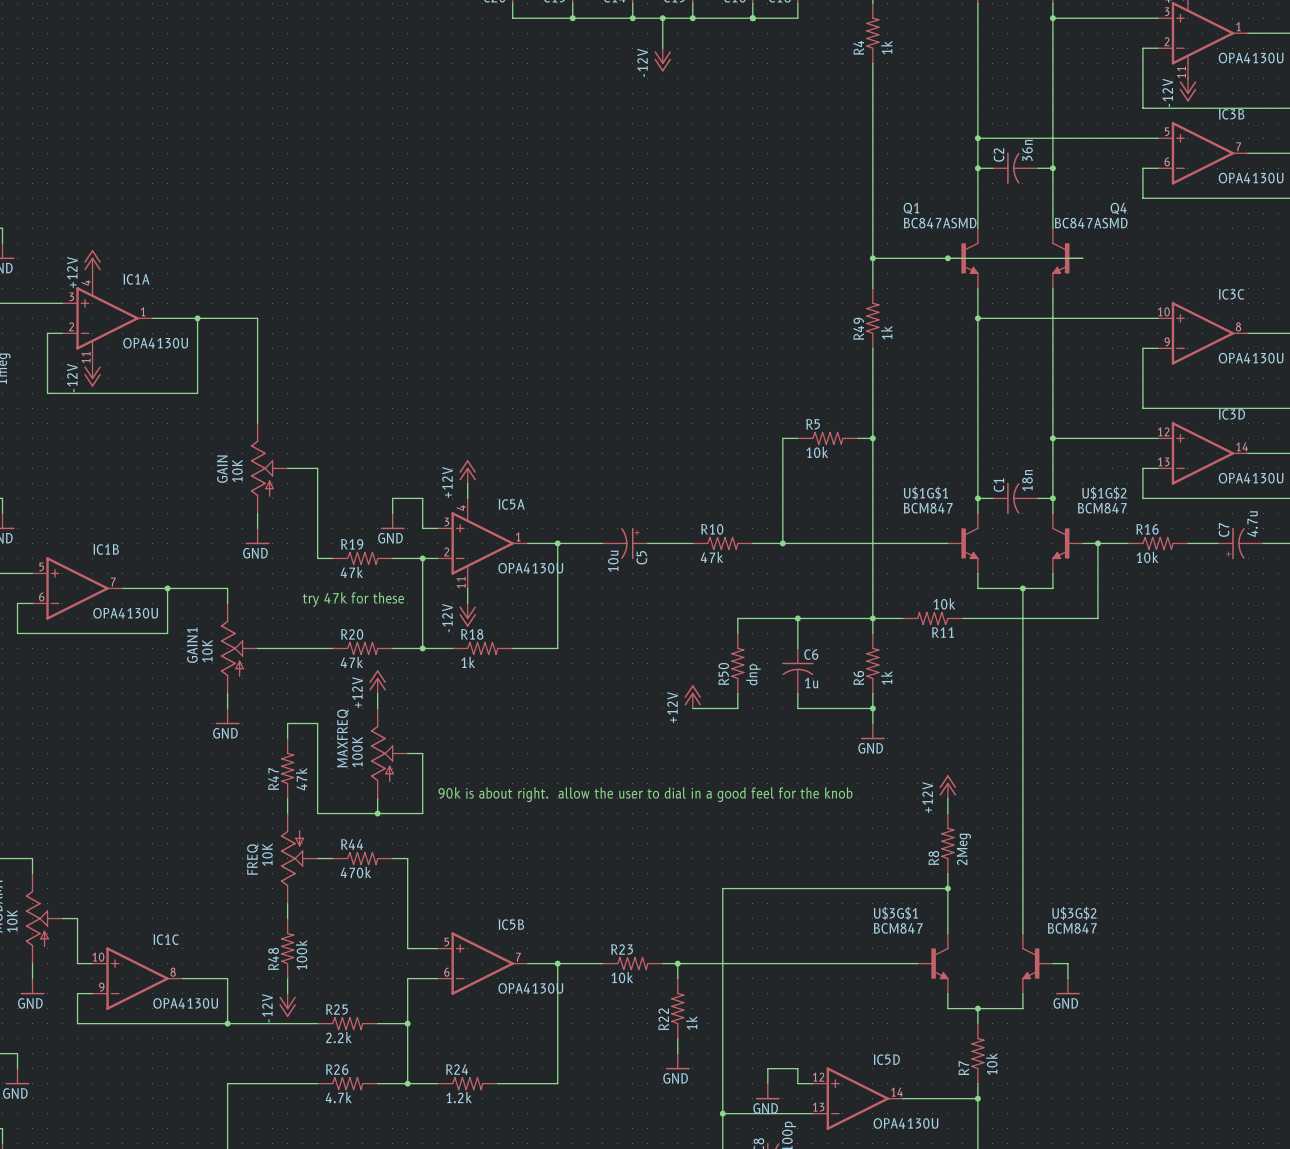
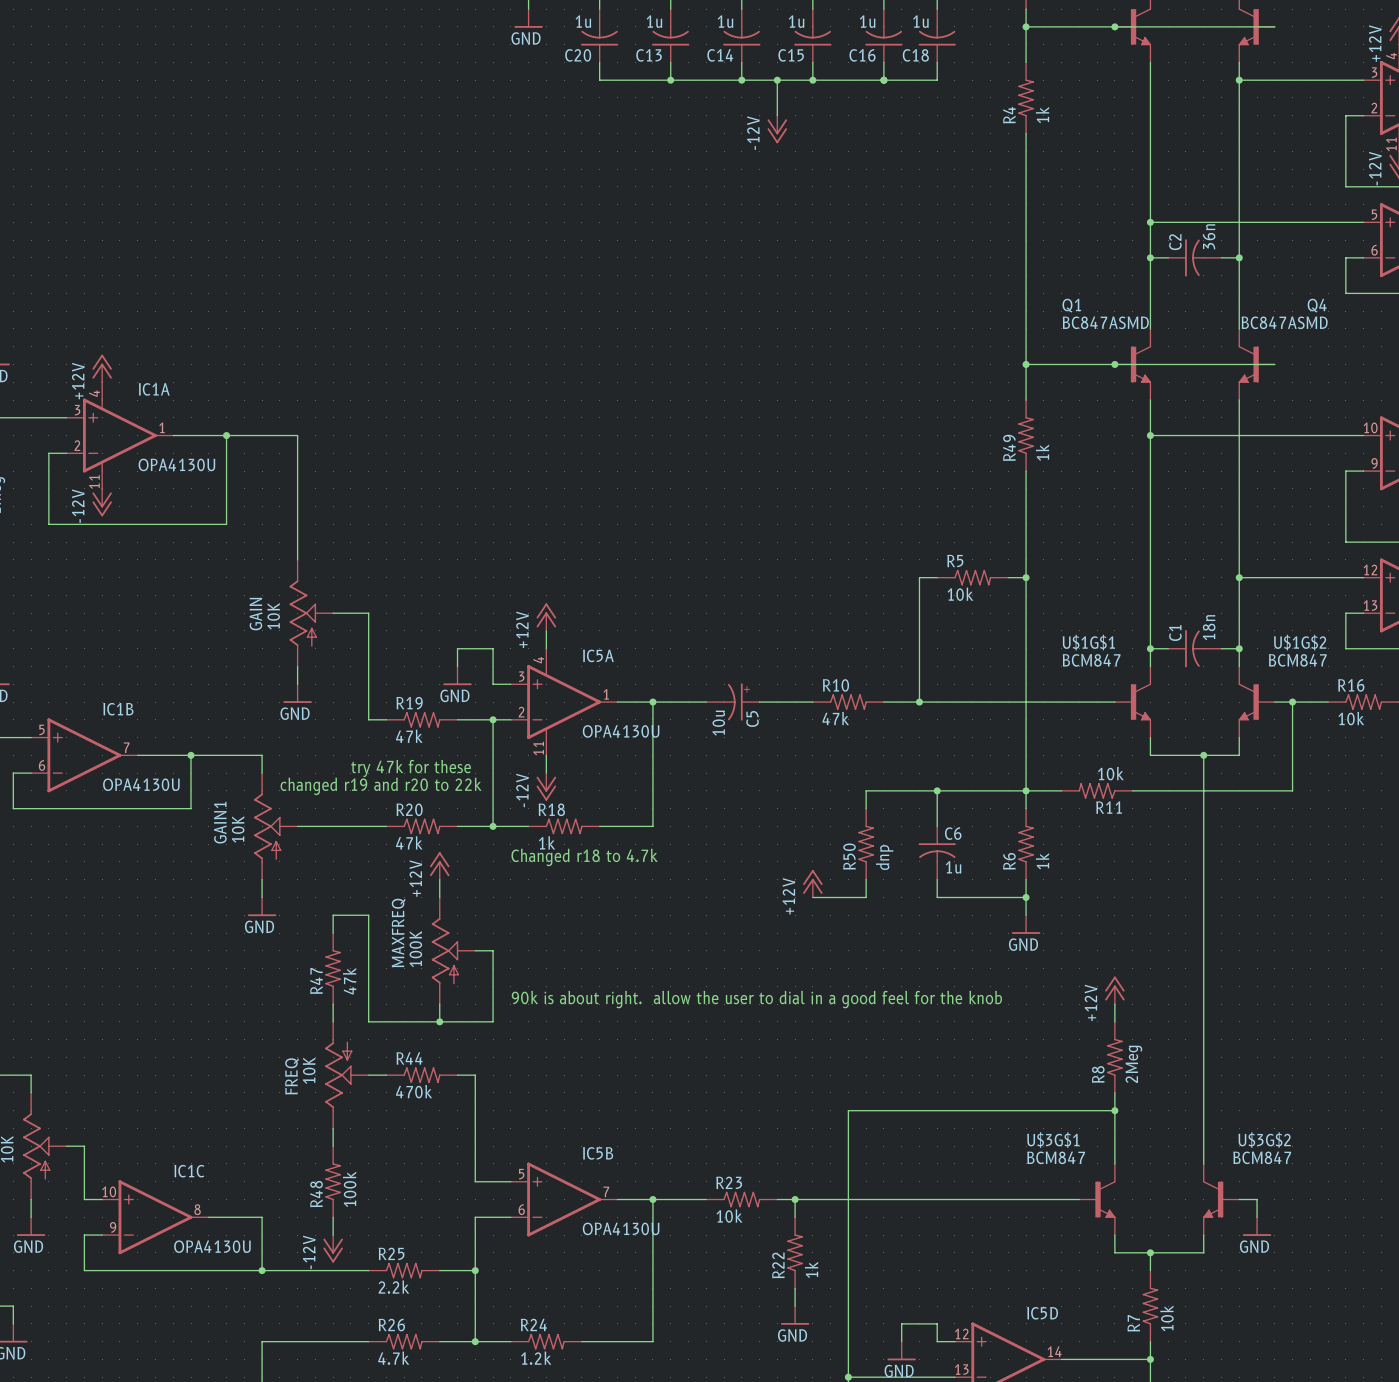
text: none -> changed r19 and r20 to 22k (381, 786)
text: none -> Changed r18 to 4.7k (584, 857)

